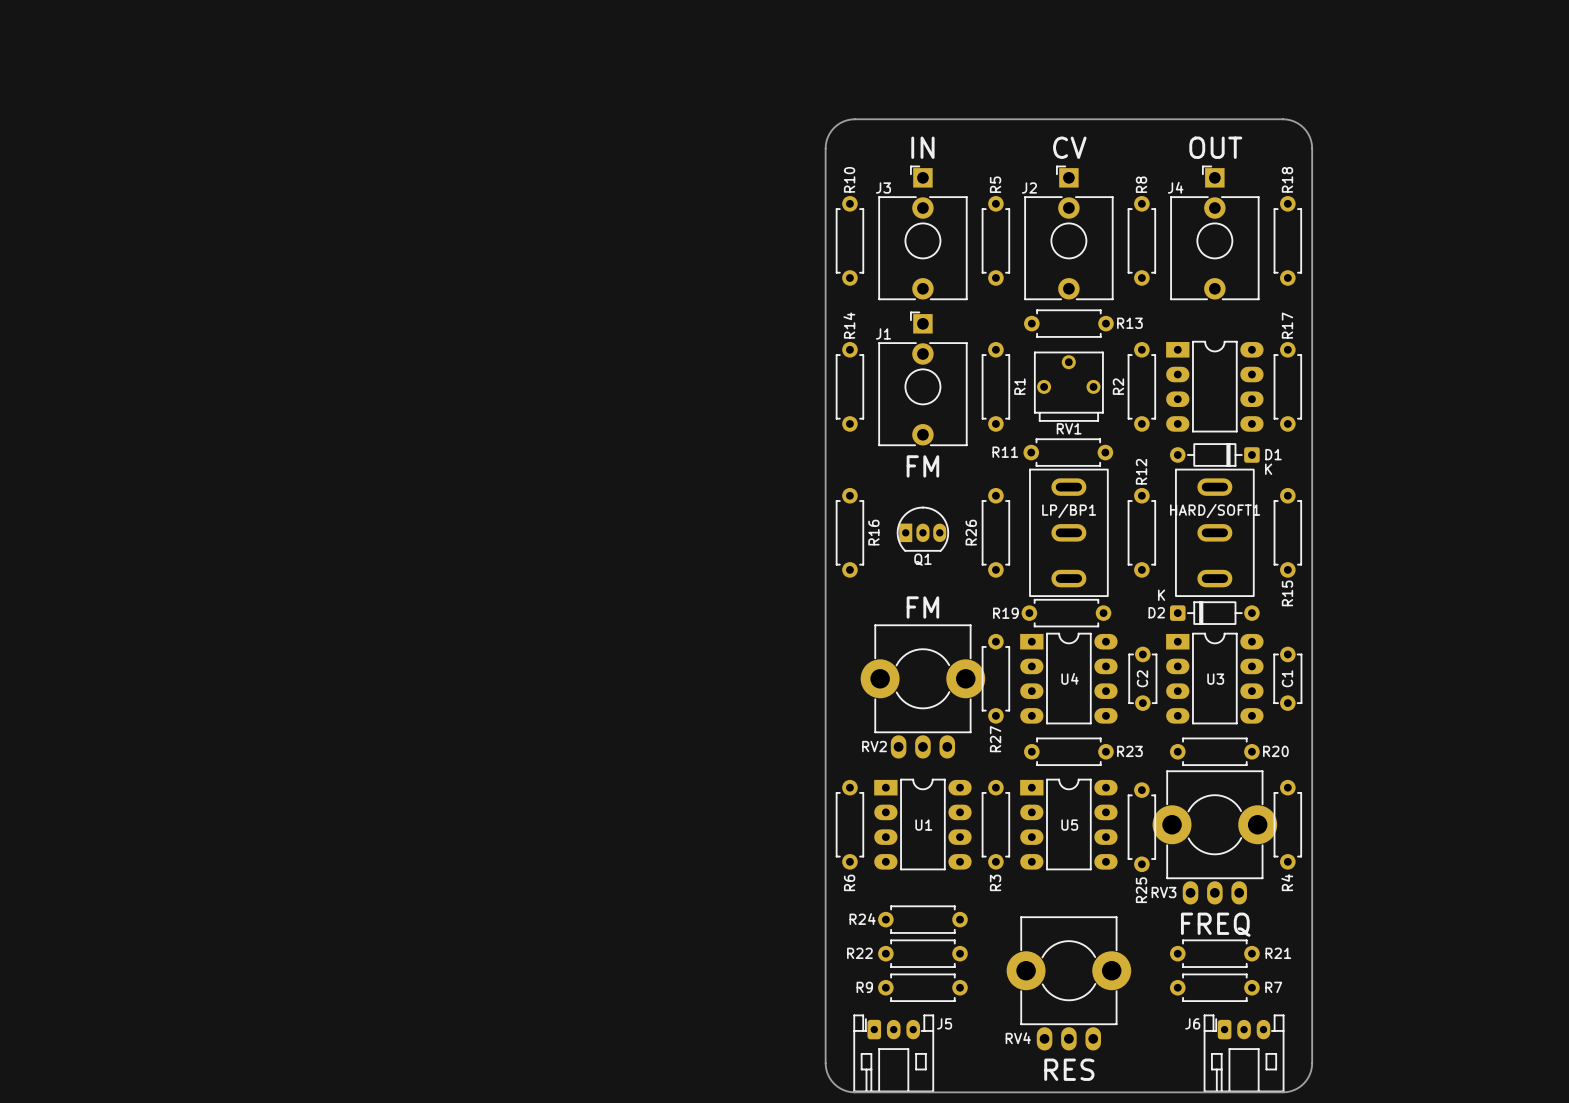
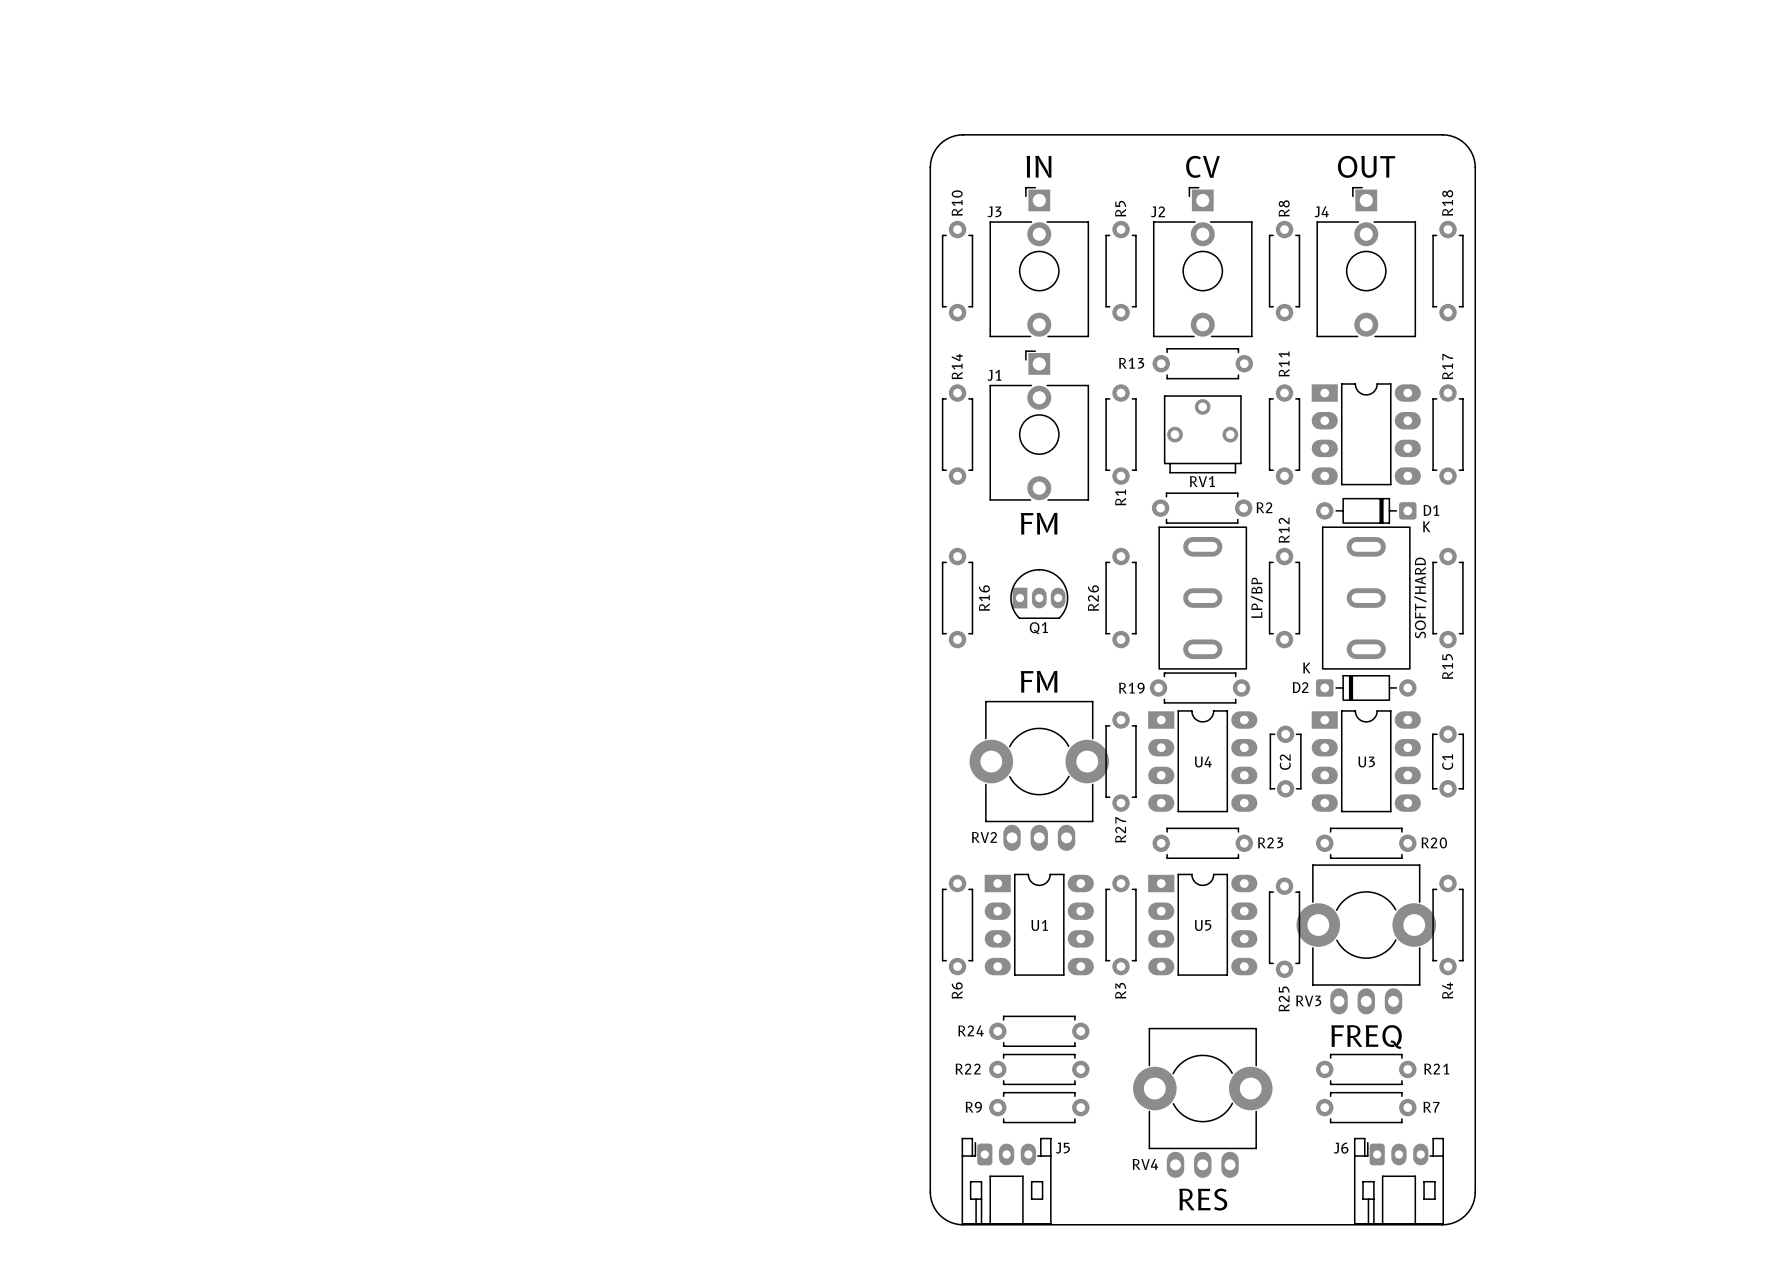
R13 name position: R13 (1129, 323) -> R13 (1131, 363)
R1 name position: R1 (1019, 386) -> R1 (1120, 497)
R2 name: R2 (1118, 386) -> R11 (1284, 364)
R11 name: R11 (1005, 452) -> R2 (1264, 507)
LP/BP1 name: LP/BP1 (1069, 511) -> LP/BP (1256, 597)
HARD/SOFT1 name: HARD/SOFT1 (1215, 511) -> SOFT/HARD (1420, 597)

